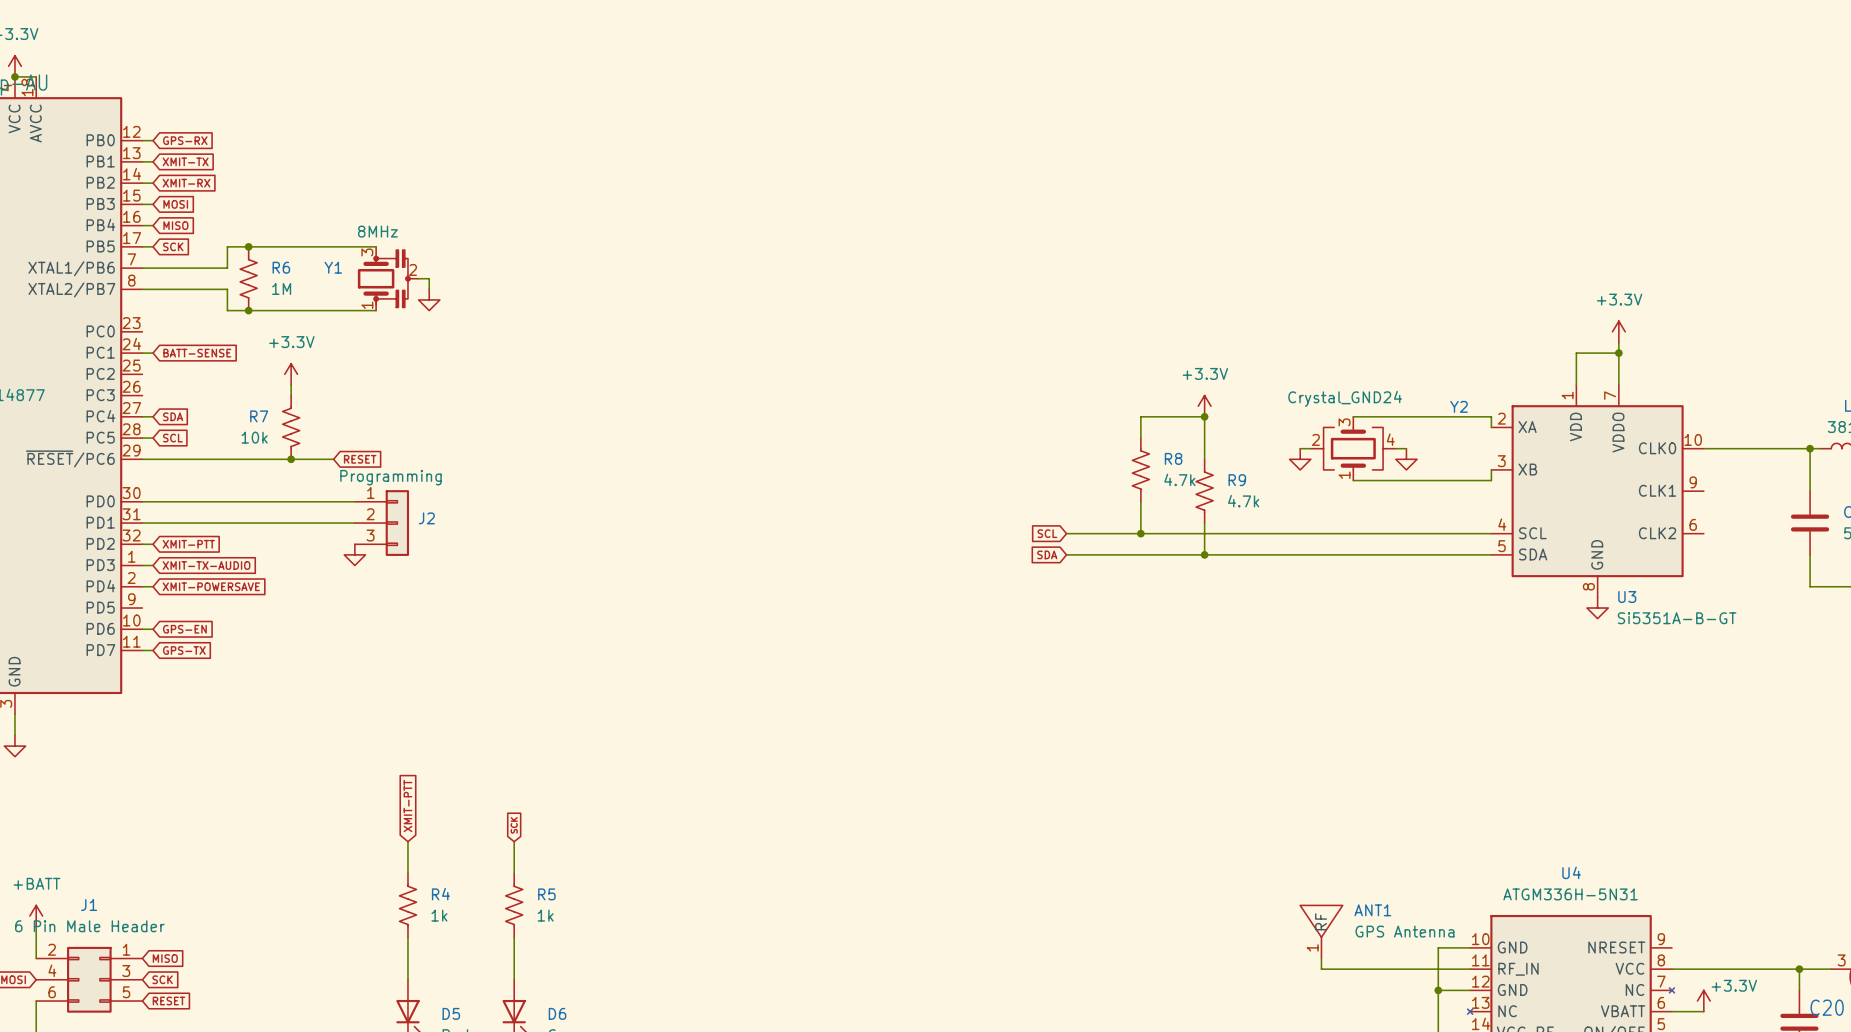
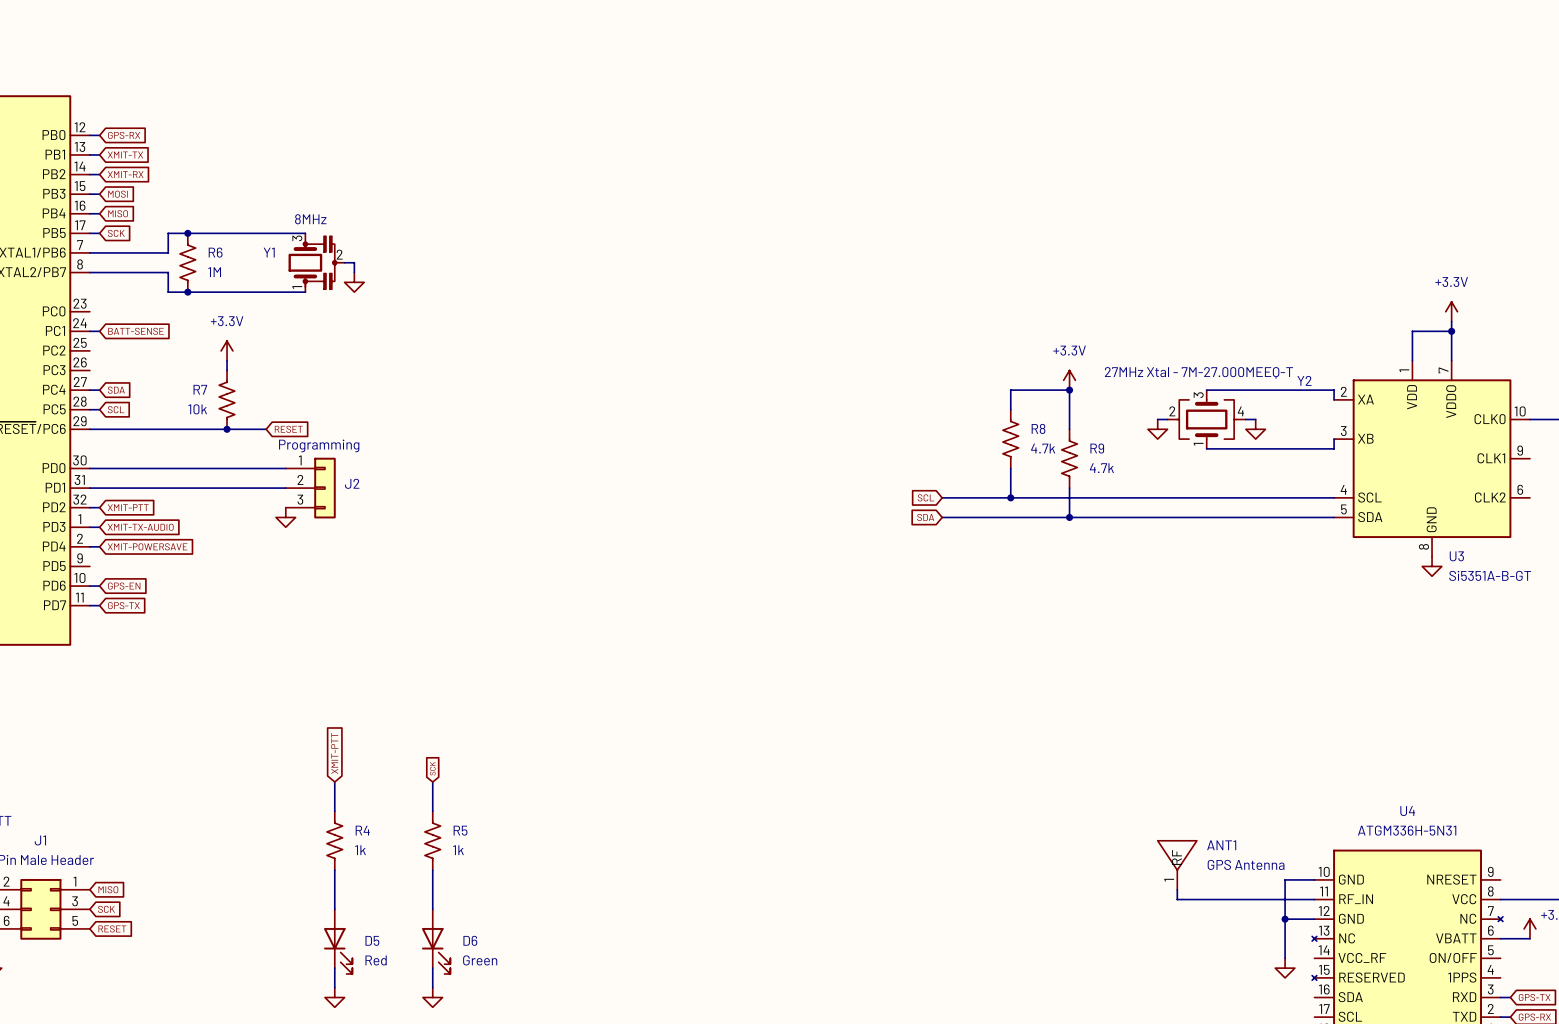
Y2 value: Crystal_GND24 (1345, 398) -> 27MHz Xtal - 7M-27.000MEEQ-T (1198, 372)

